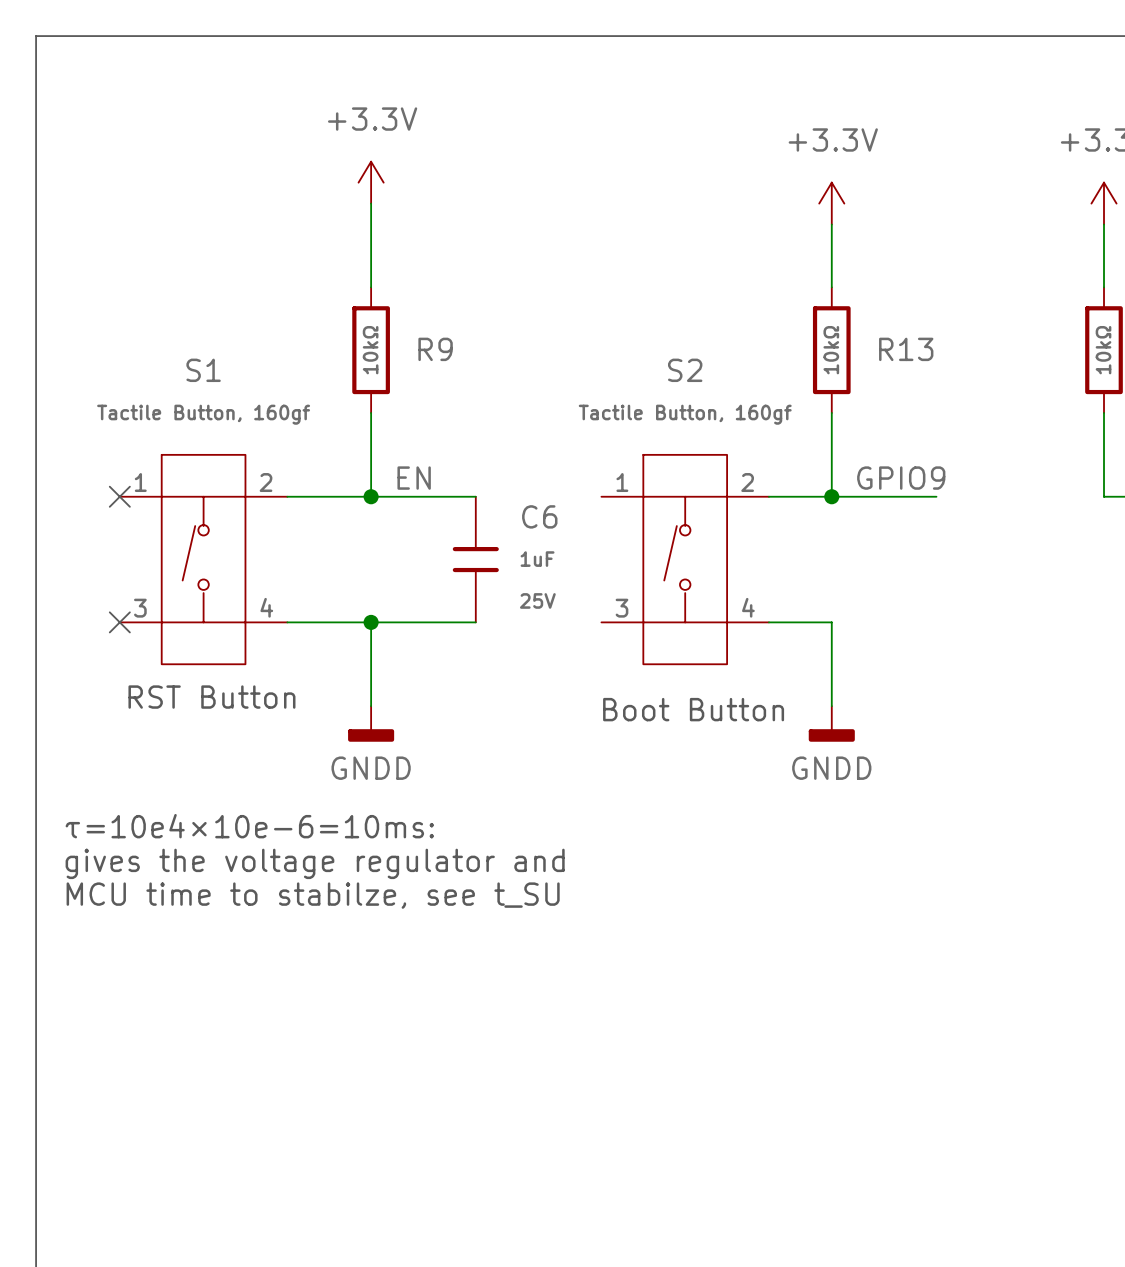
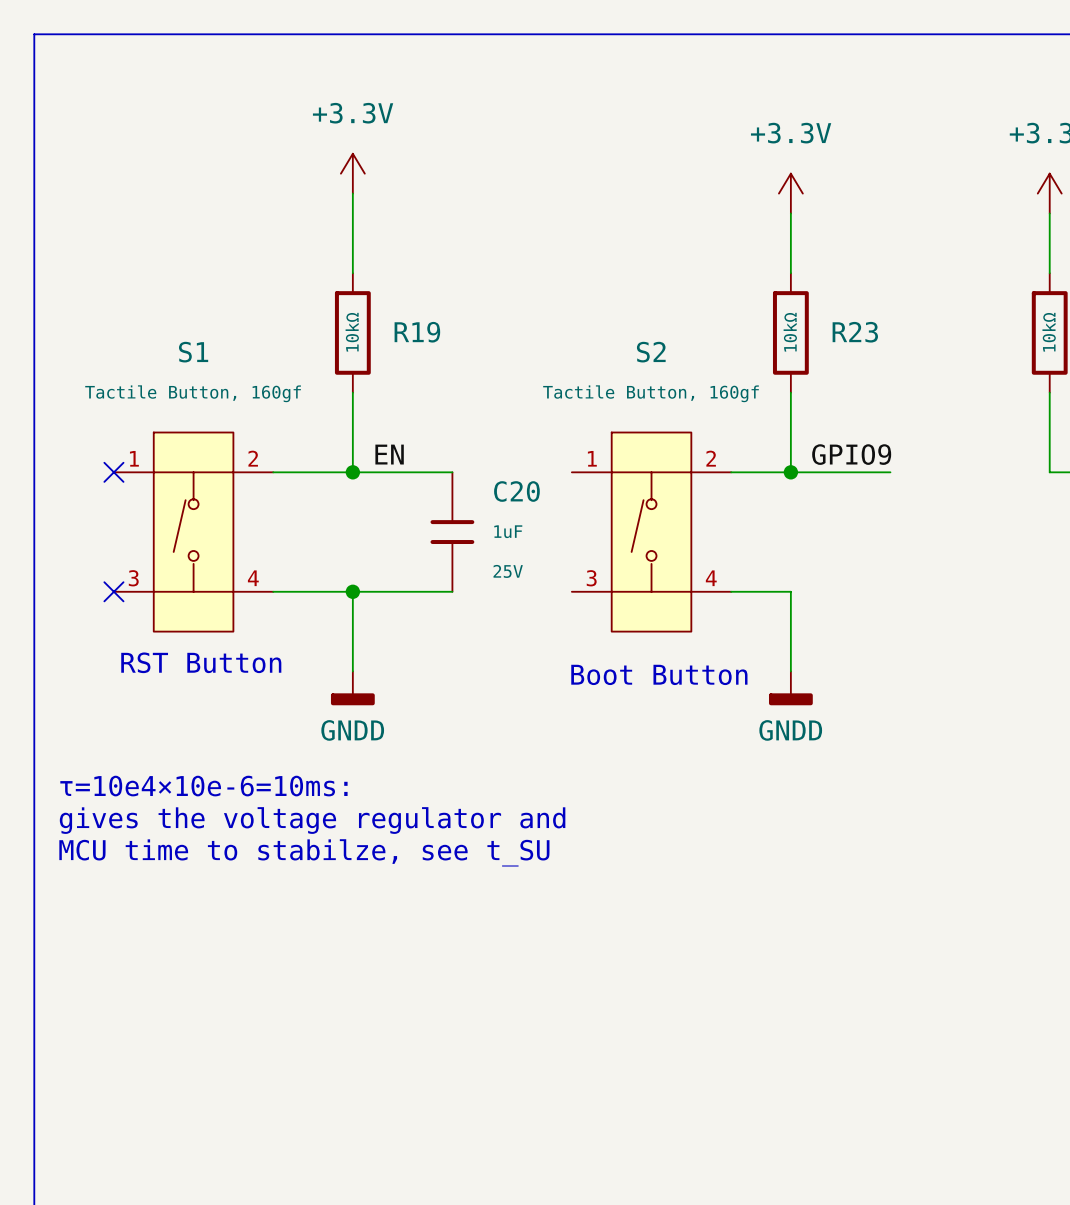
R9 name: R9 (435, 349) -> R19 (417, 332)
R13 name: R13 (906, 349) -> R23 (855, 332)
C6 name: C6 (539, 516) -> C20 (516, 491)

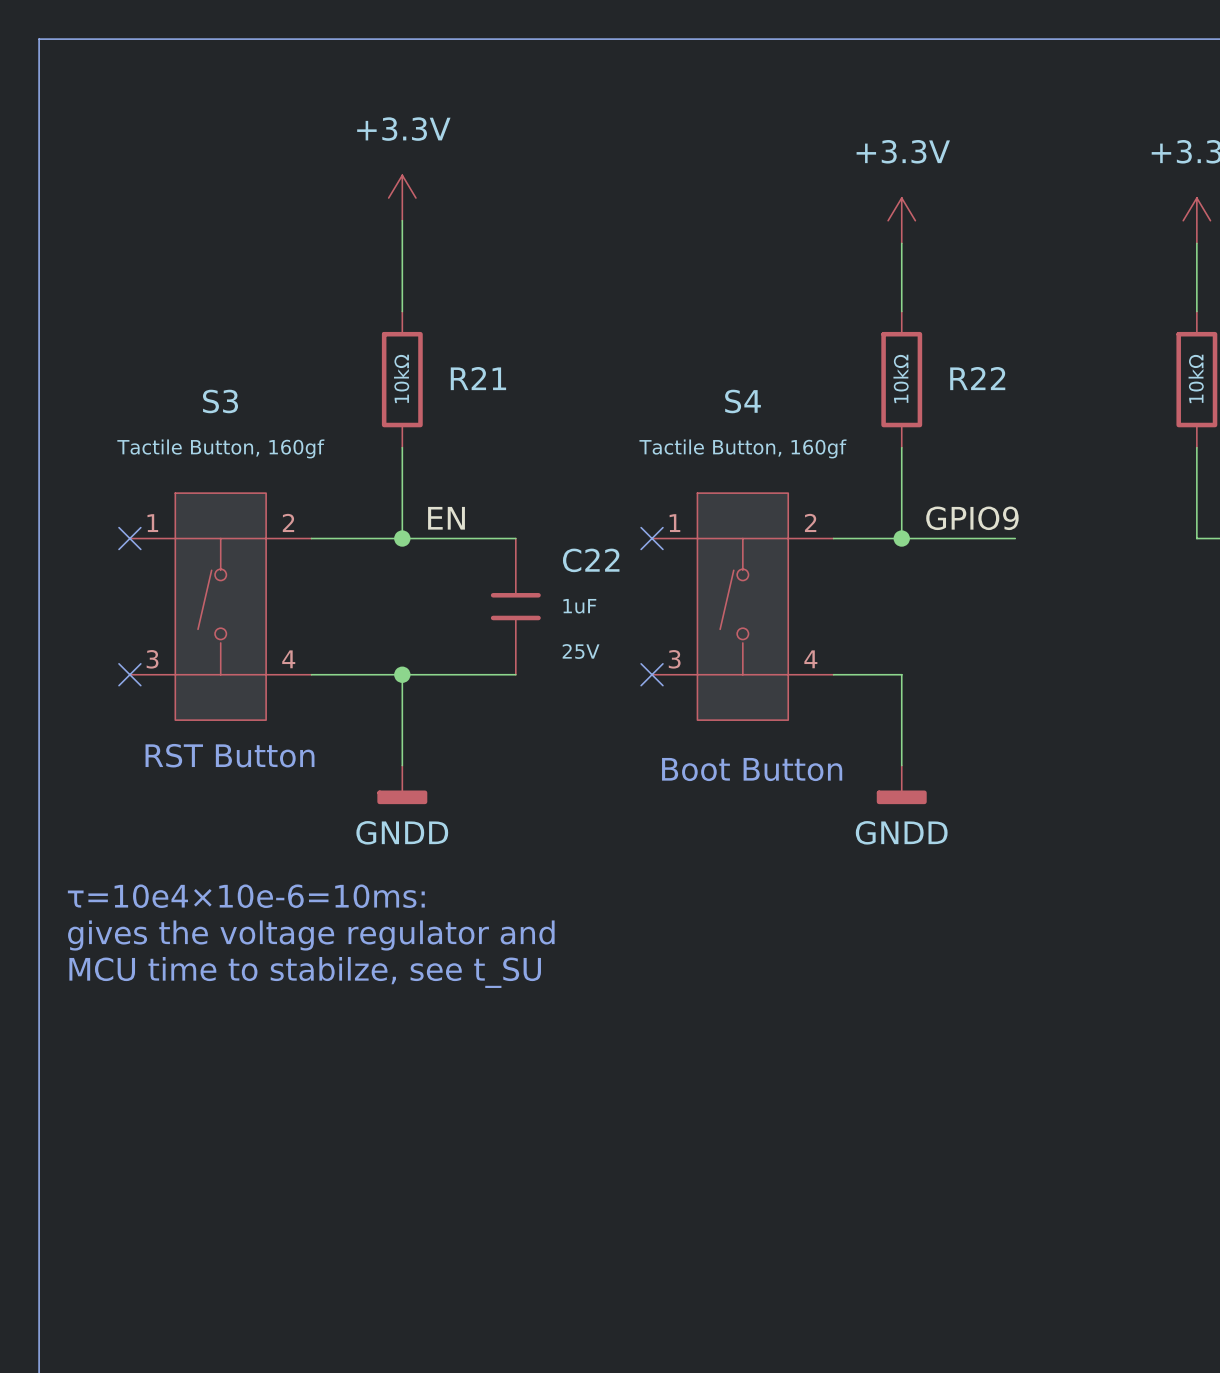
R19 name: R19 (417, 332) -> R21 (478, 378)
R23 name: R23 (855, 332) -> R22 (977, 378)
S1 name: S1 (193, 352) -> S3 (220, 401)
S2 name: S2 (651, 352) -> S4 (742, 401)
no-connect mark: none -> (652, 538)
C20 name: C20 (516, 491) -> C22 (591, 560)
no-connect mark: none -> (652, 674)

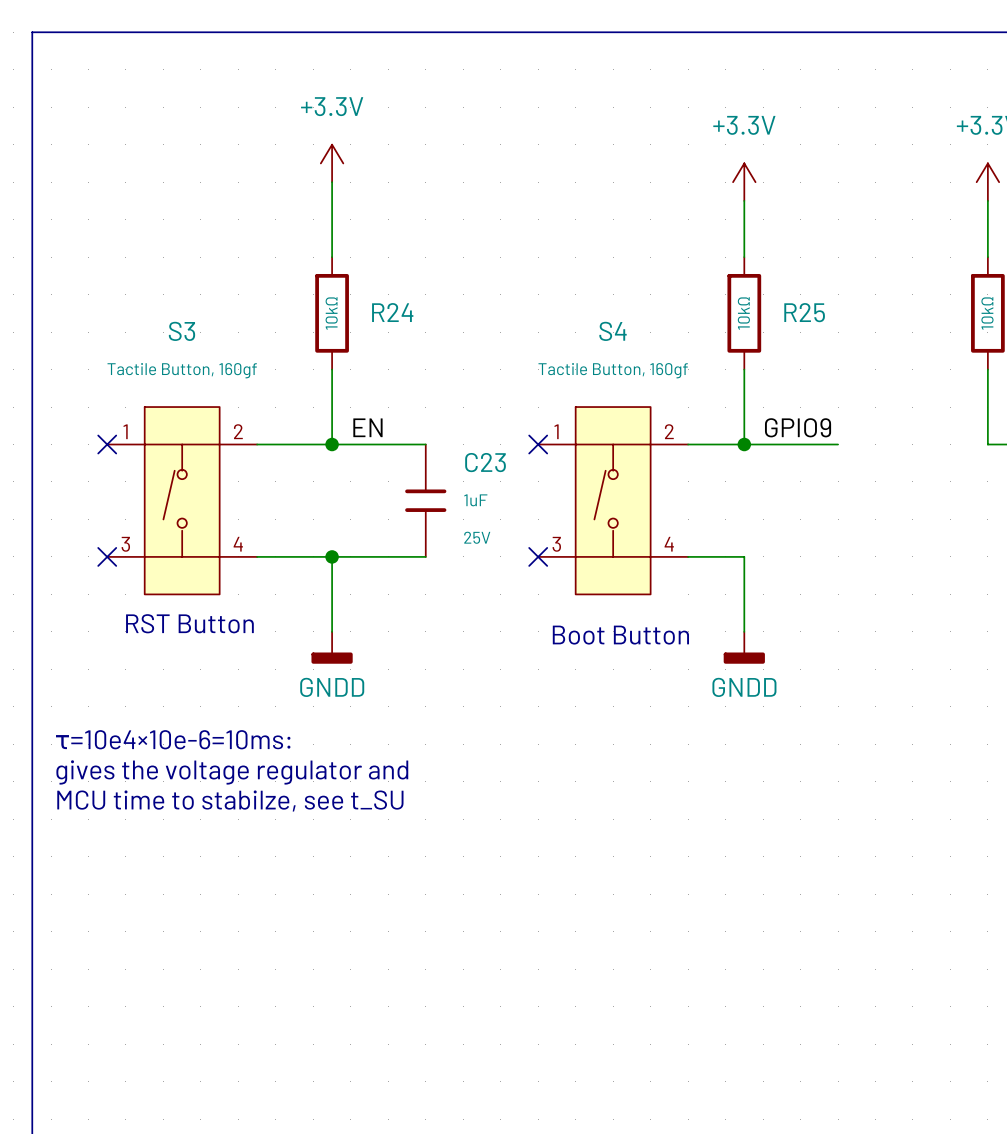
R21 name: R21 (478, 378) -> R24 (392, 312)
R22 name: R22 (977, 378) -> R25 (804, 312)
C22 name: C22 (591, 560) -> C23 (485, 462)

